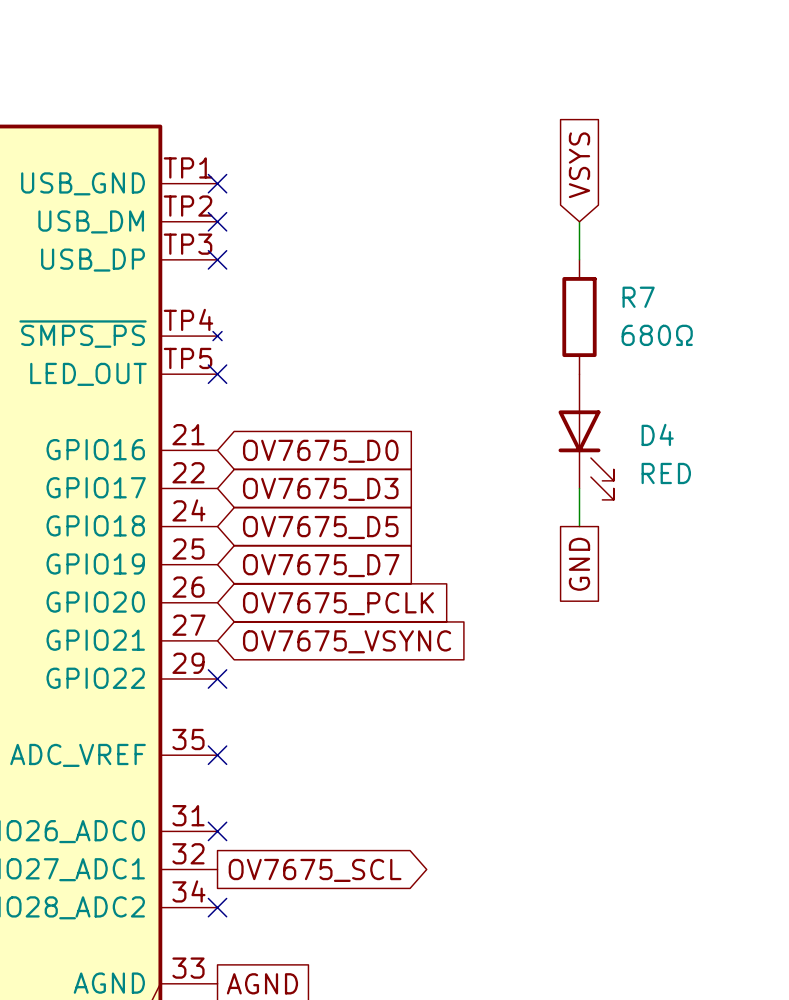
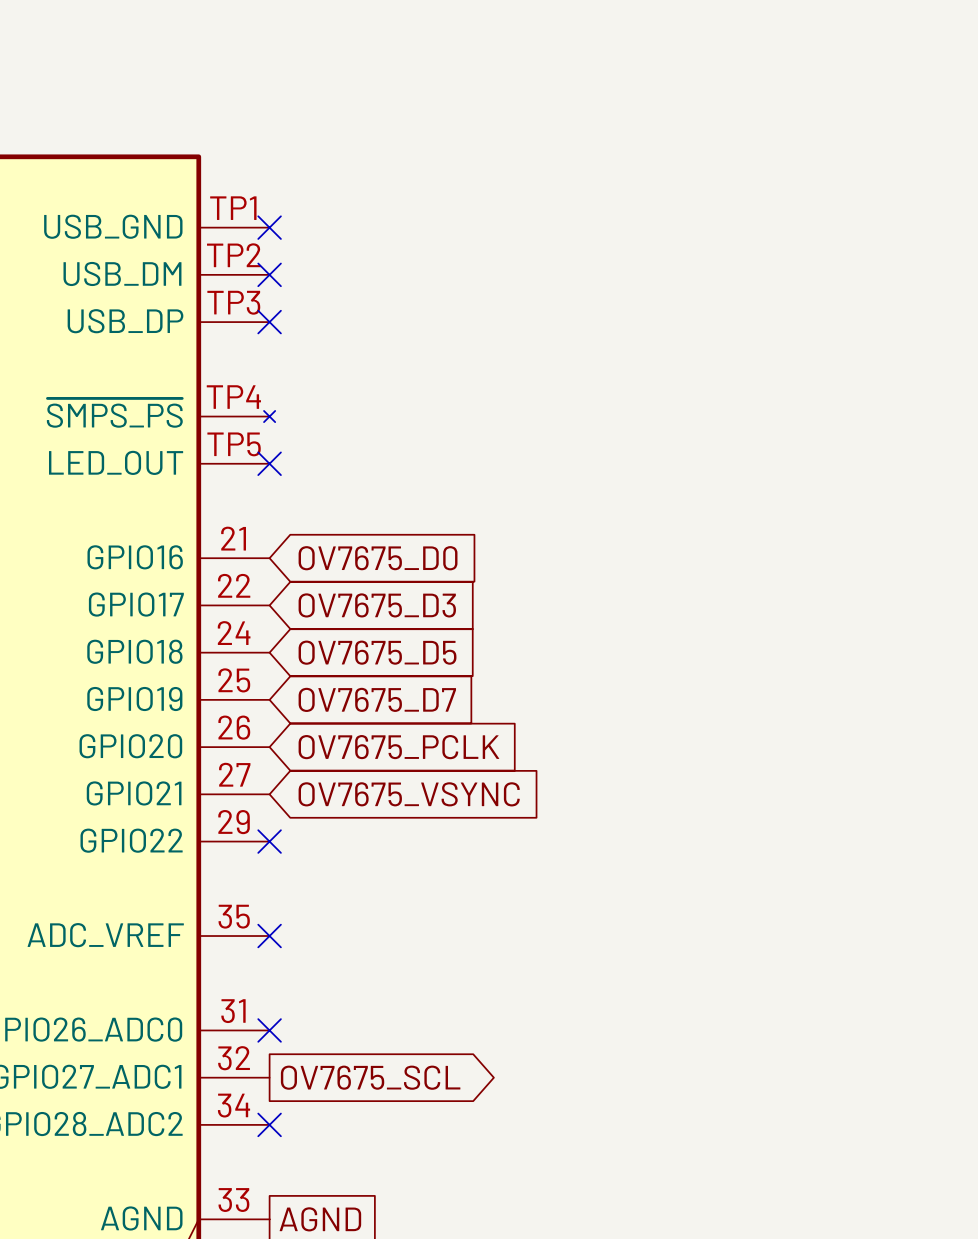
global label: VSYS (579, 165) -> none
wire: (579, 221) (579, 259) -> none
R7: 680Ω (579, 317) -> none
D4: RED (586, 437) -> none
wire: (579, 488) (579, 526) -> none
global label: GND (579, 564) -> none

